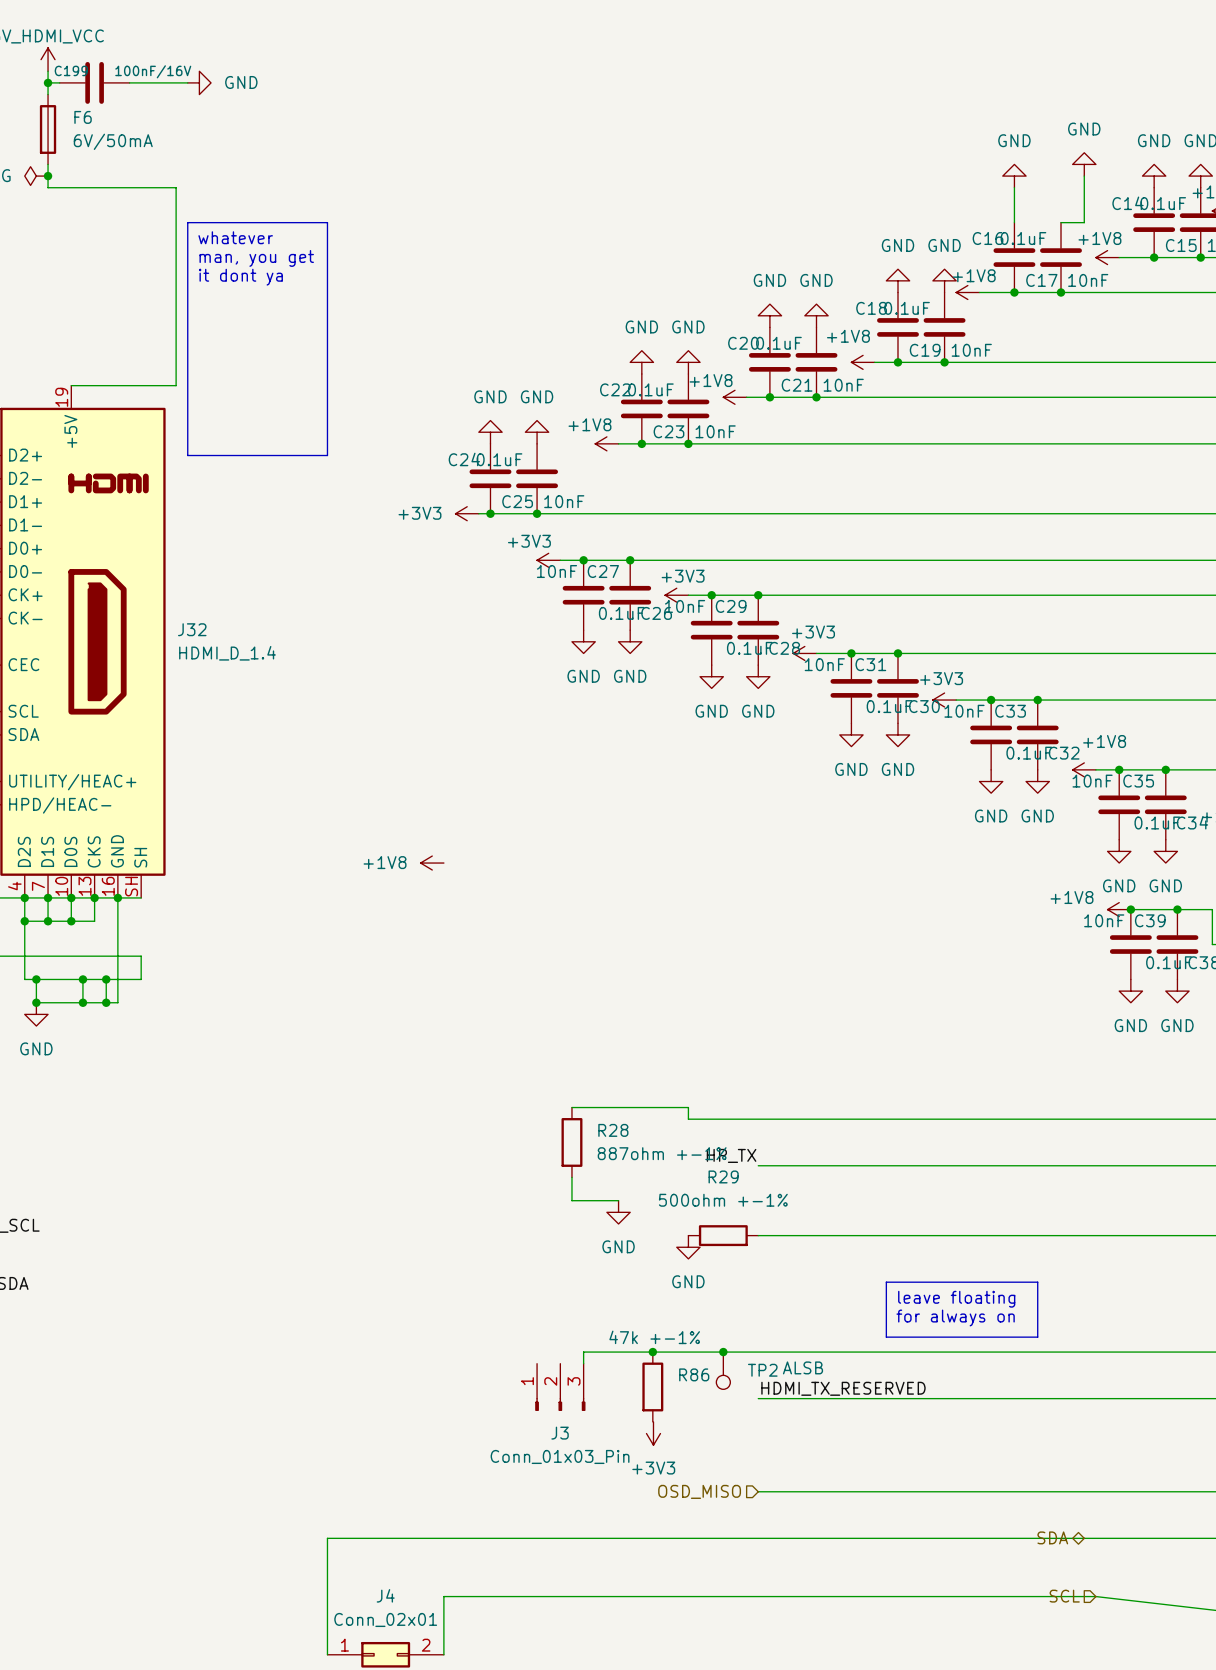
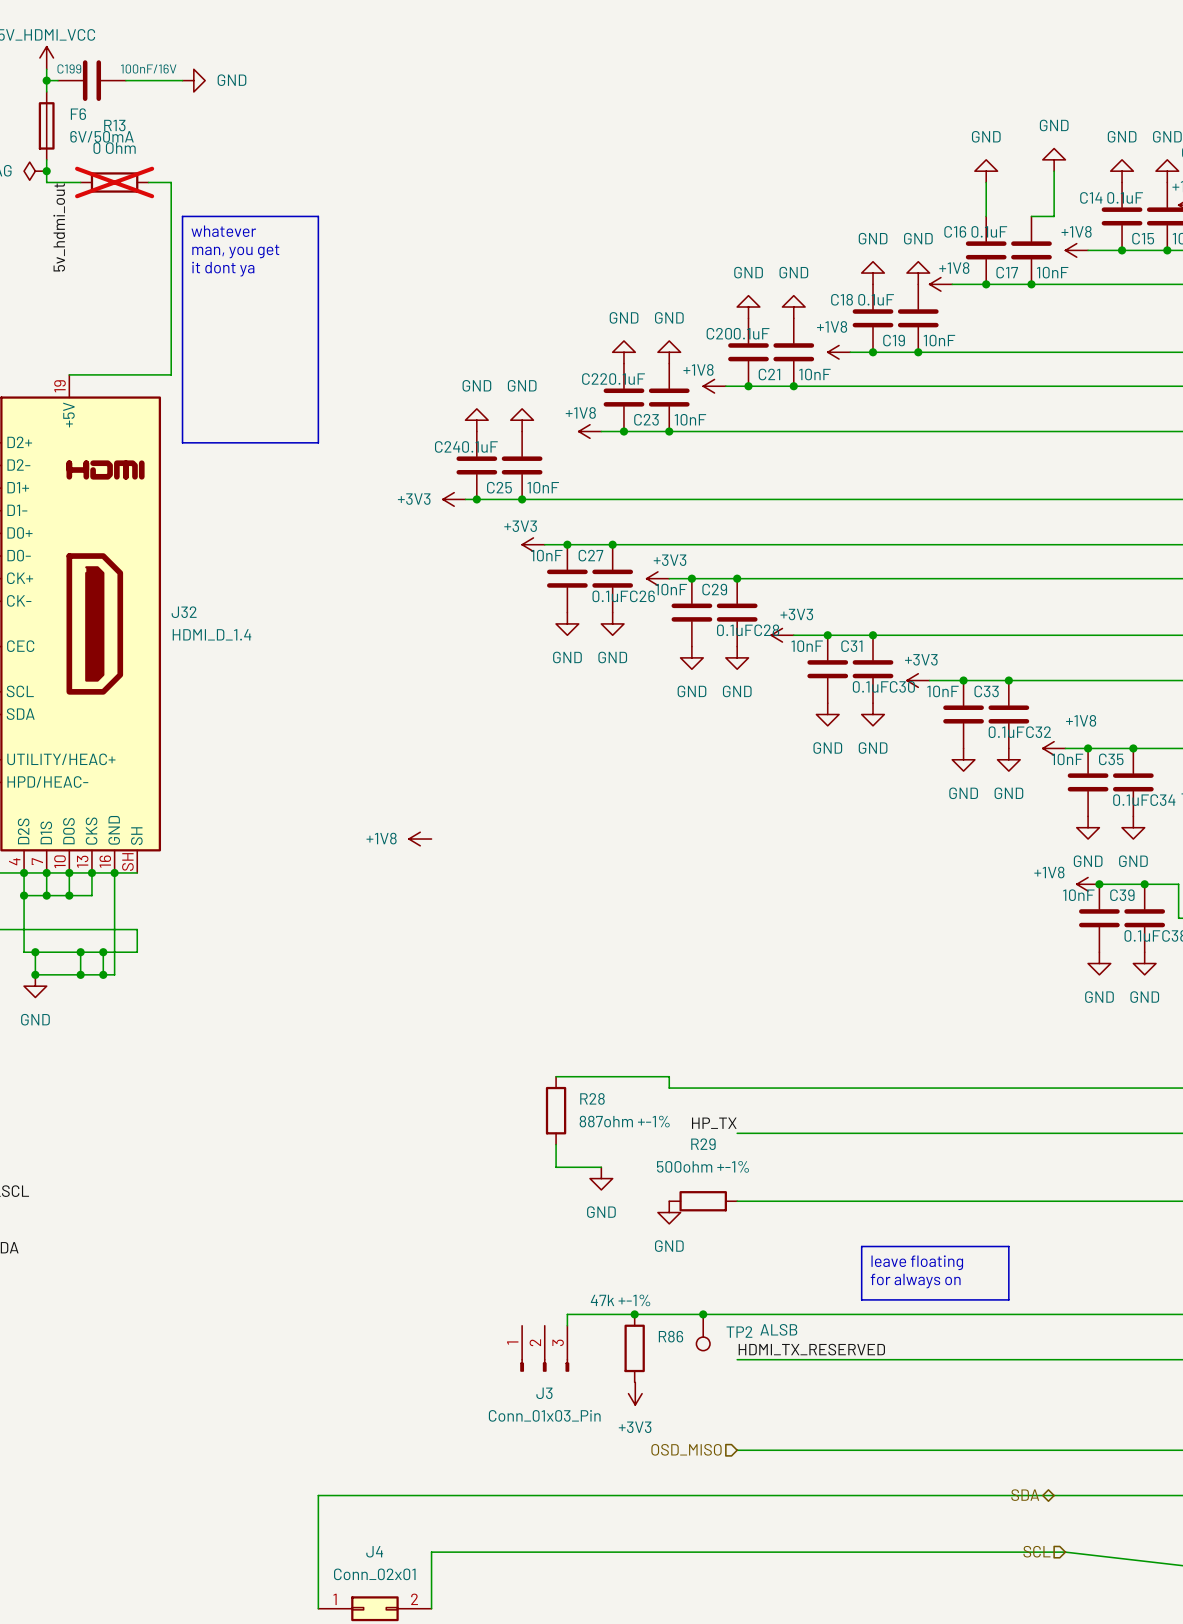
R13: none -> 0 Ohm (114, 182)
label: none -> 5v_hdmi_out (59, 227)

